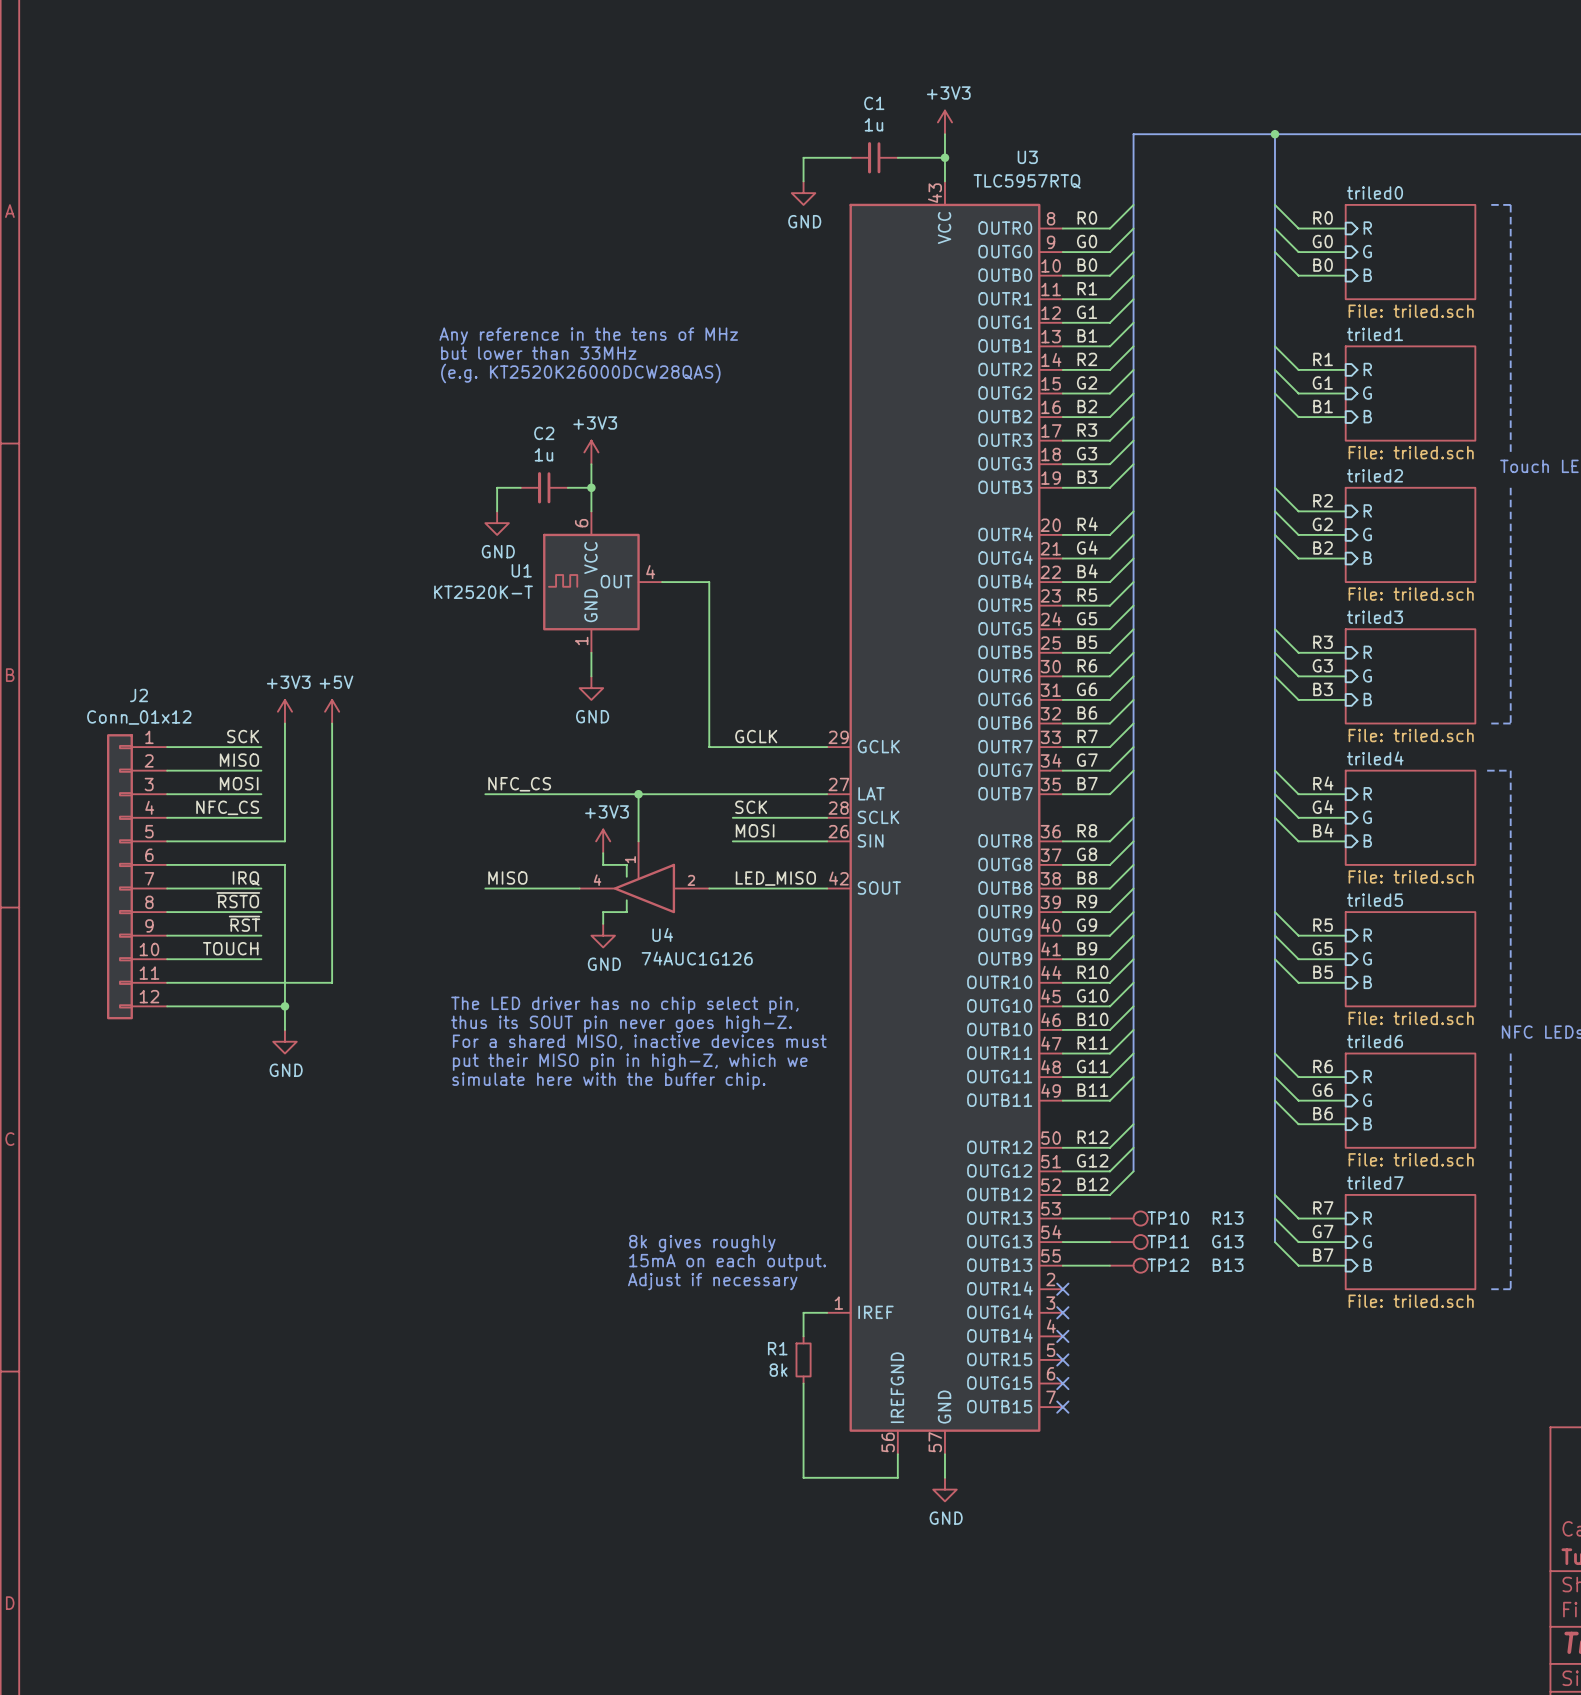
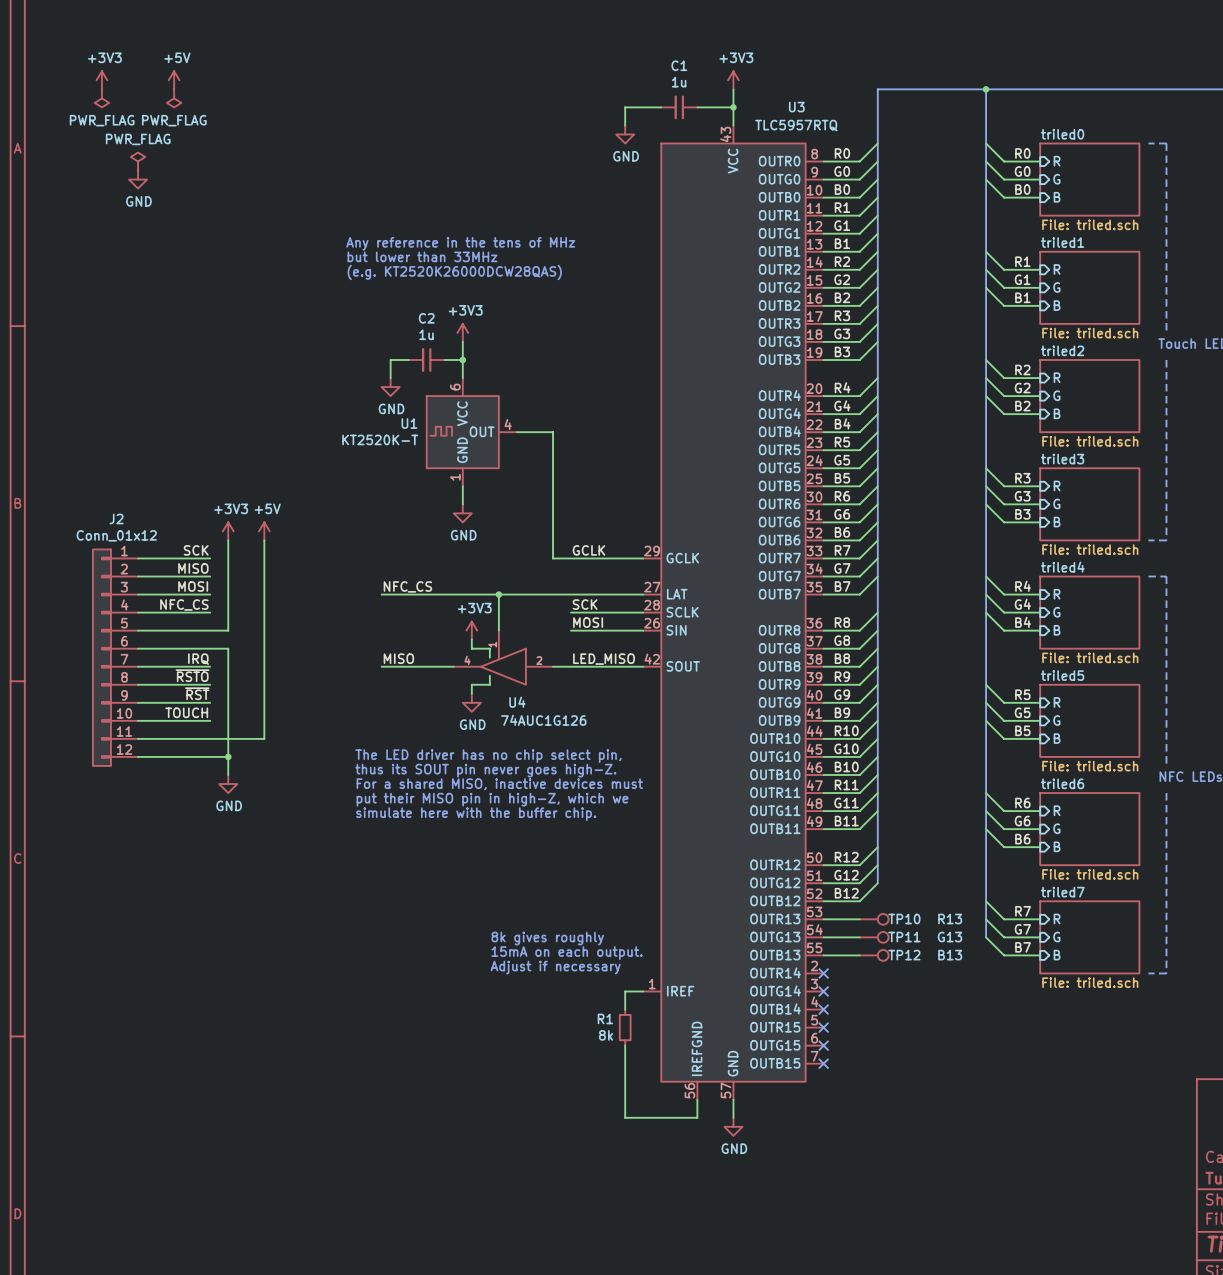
power symbol: none -> +3V3 (101, 80)
power symbol: none -> +5V (174, 80)
power symbol: none -> PWR_FLAG (101, 98)
power symbol: none -> PWR_FLAG (174, 98)
power symbol: none -> PWR_FLAG (138, 161)
power symbol: none -> GND (138, 179)

